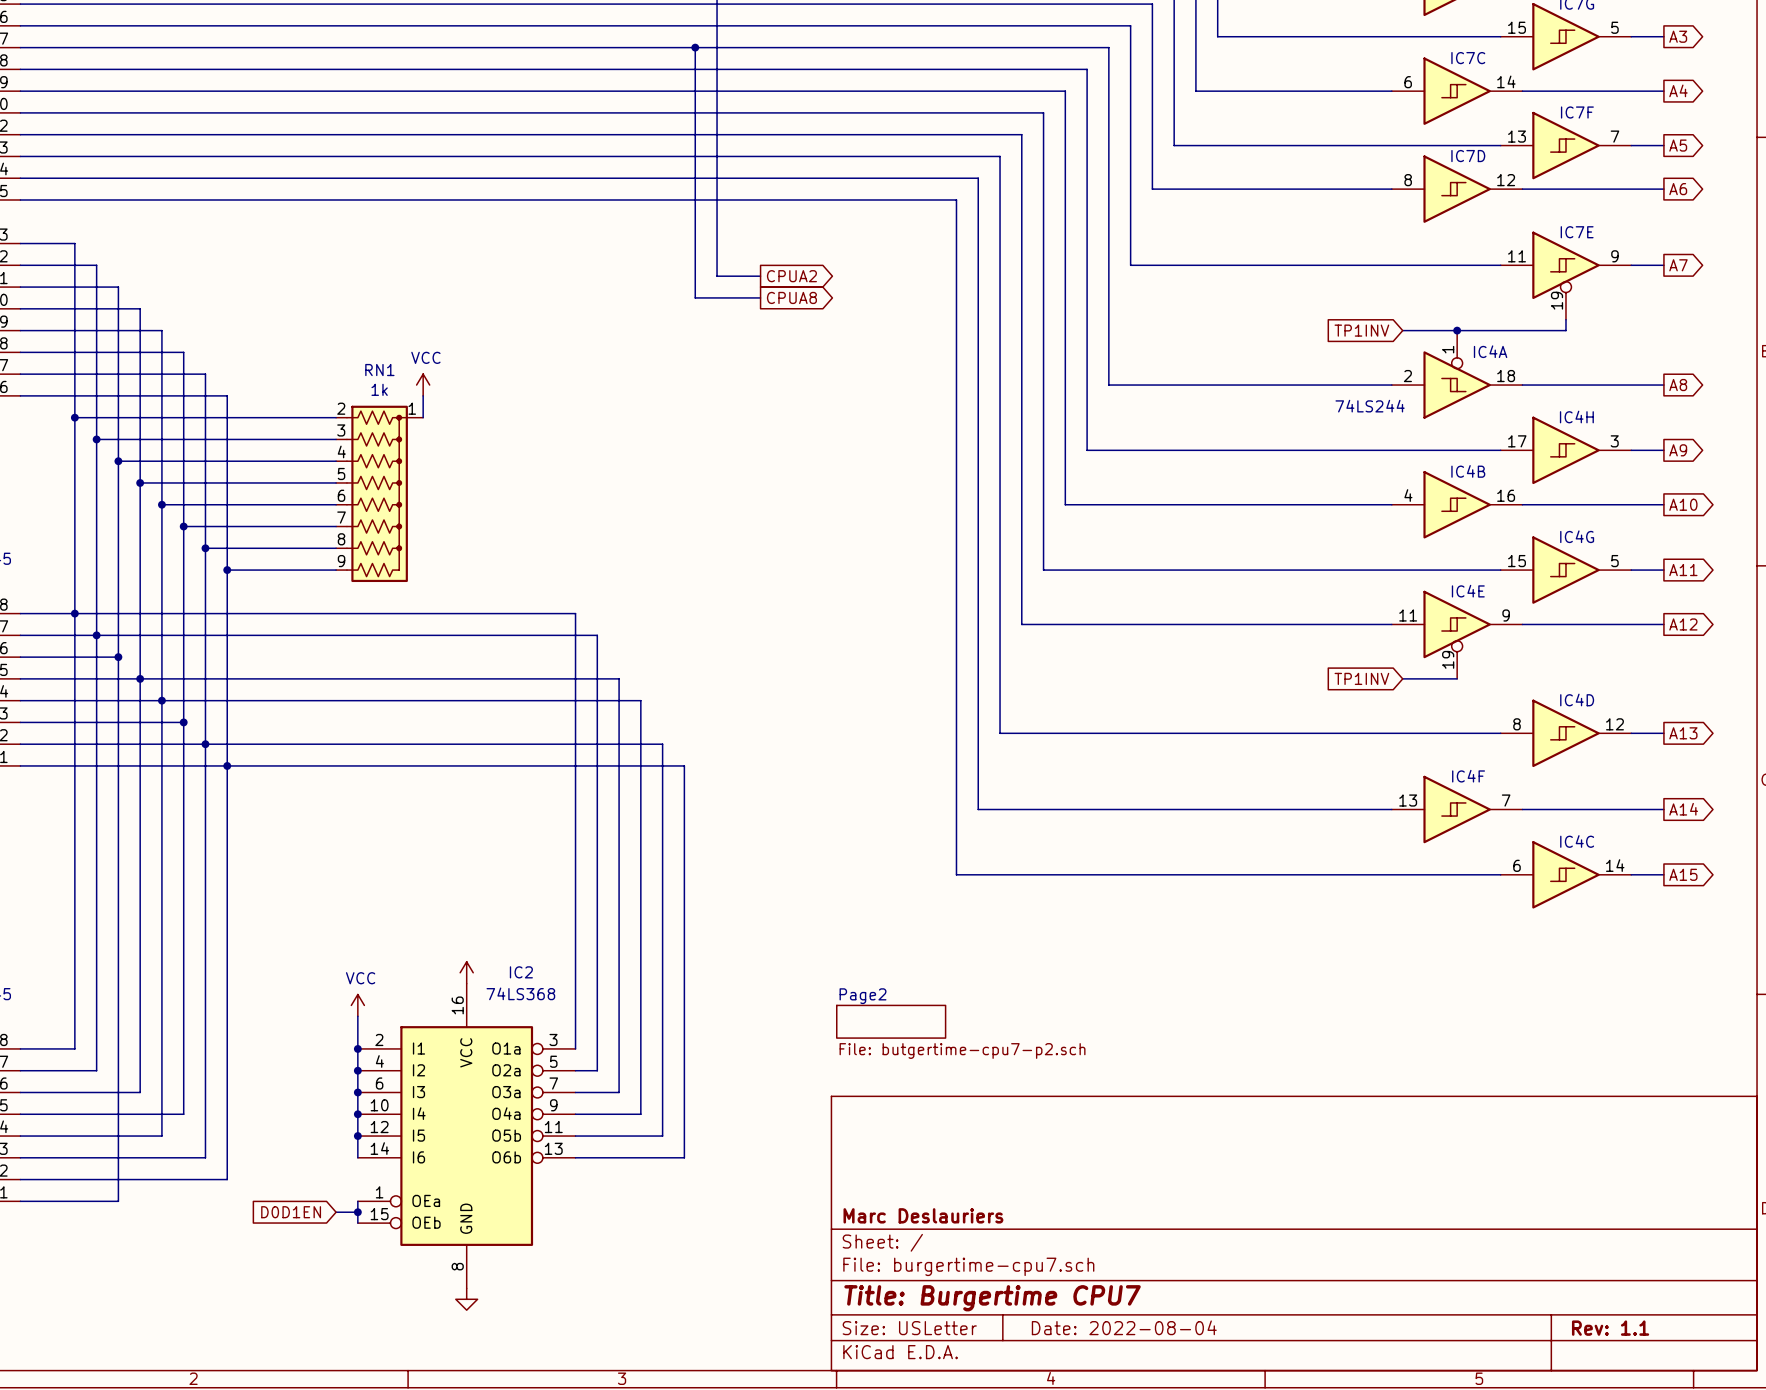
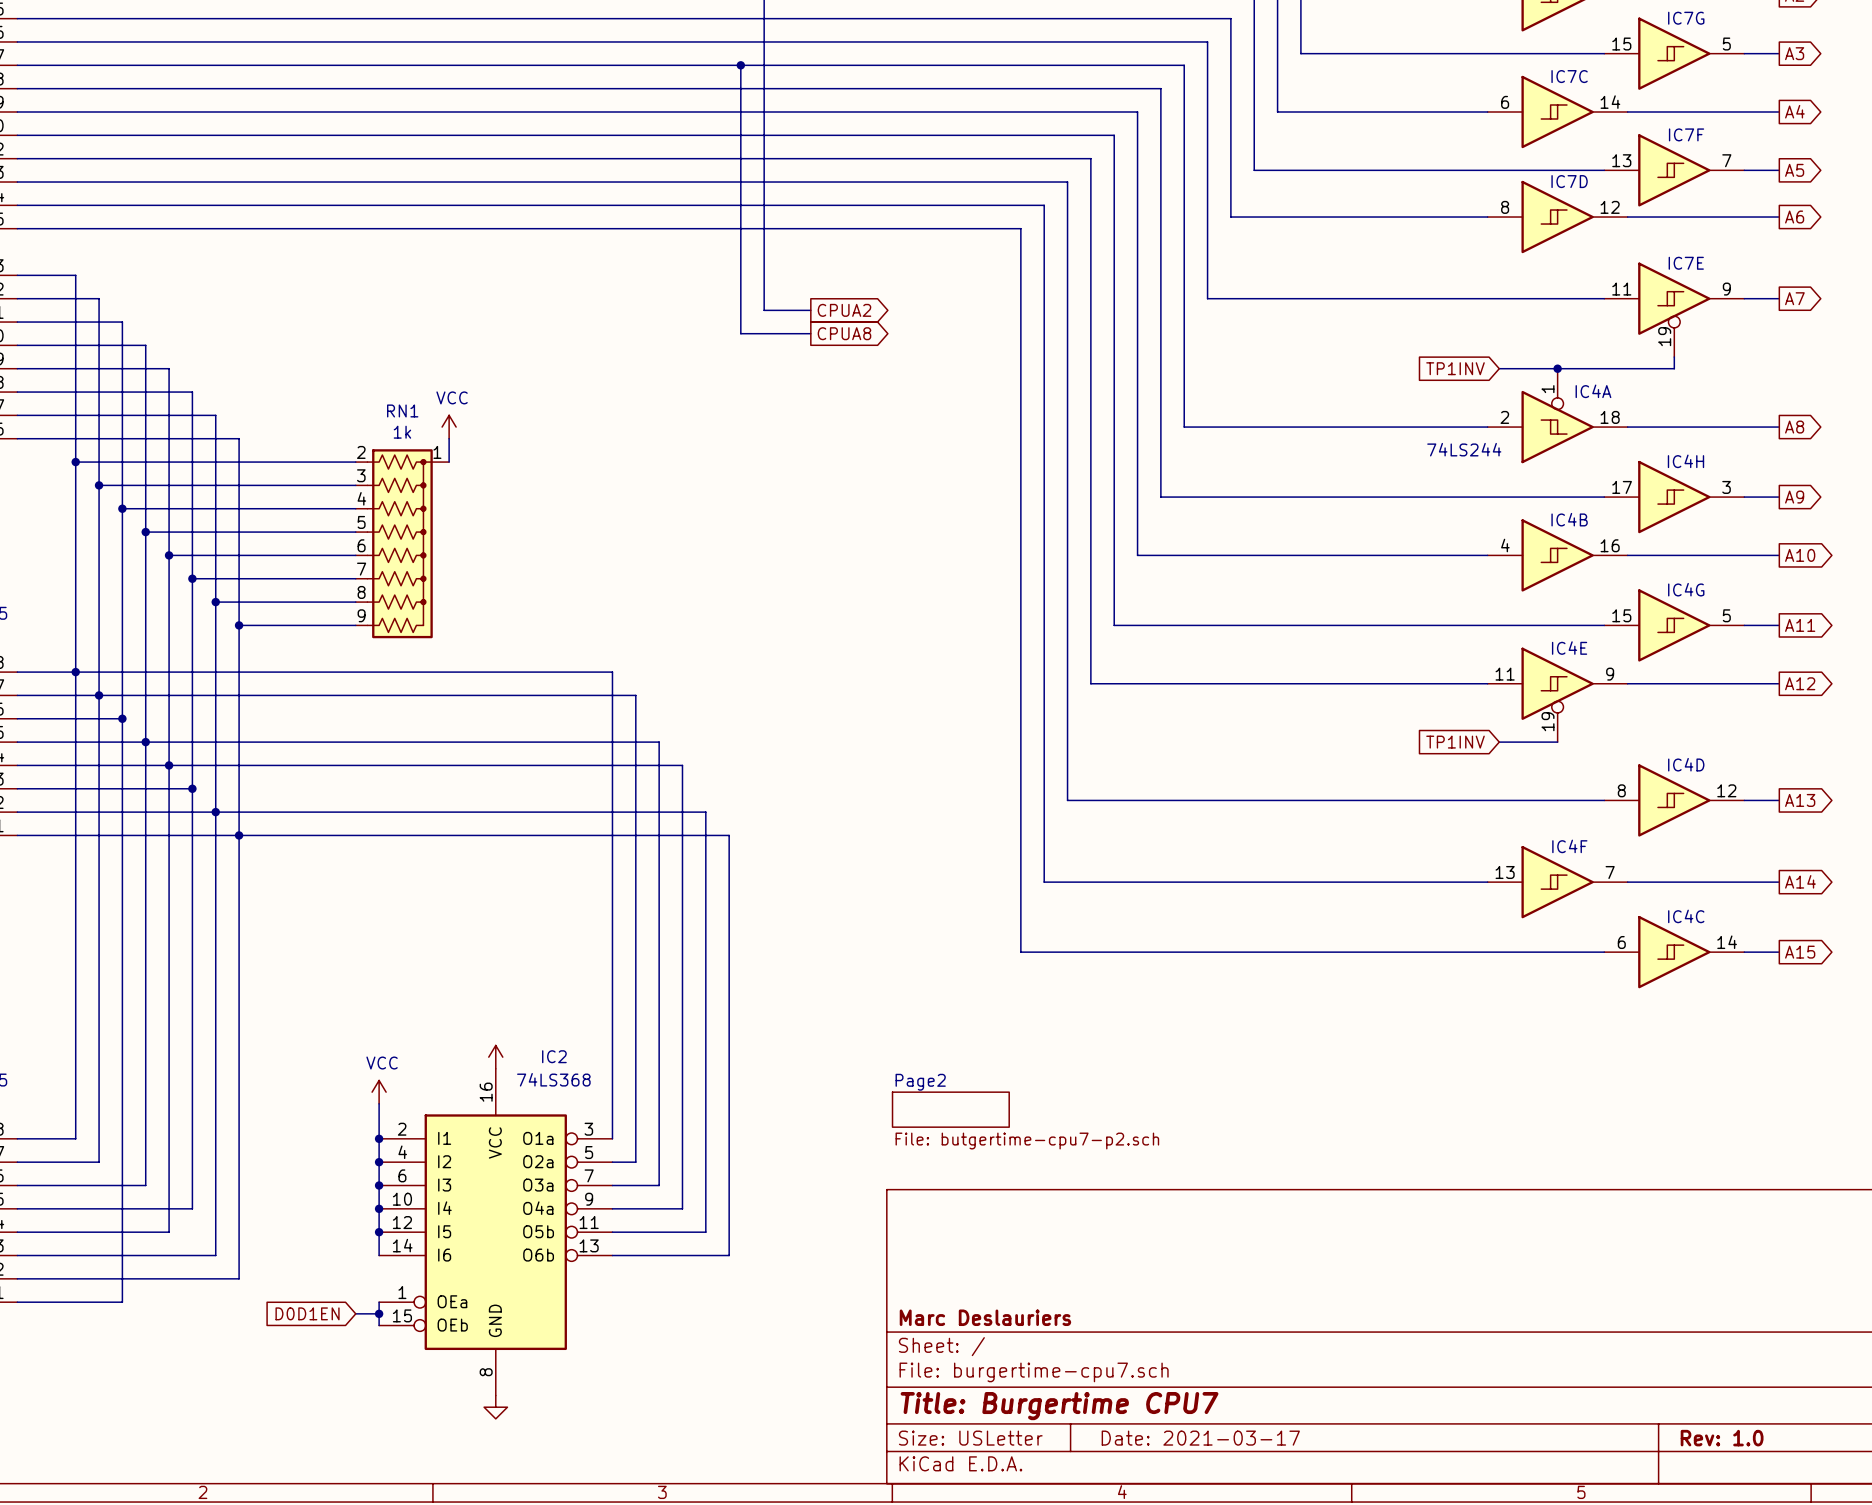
title block: Date: 2022-08-04 (1124, 1327) -> Date: 2021-03-17 (1200, 1438)
title block: Rev: 1.1 (1610, 1328) -> Rev: 1.0 (1722, 1438)

